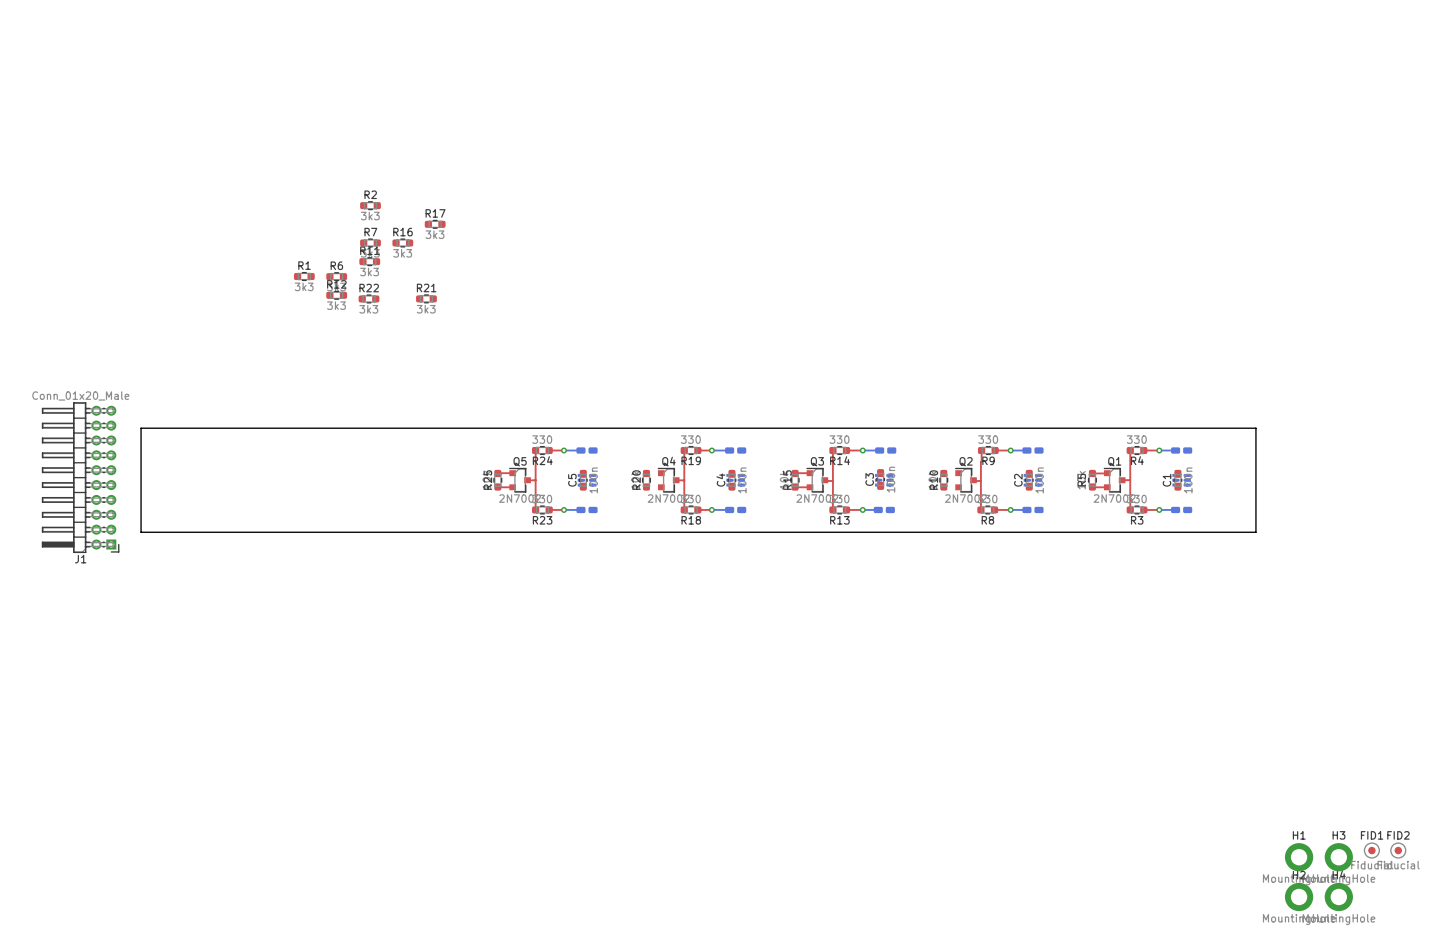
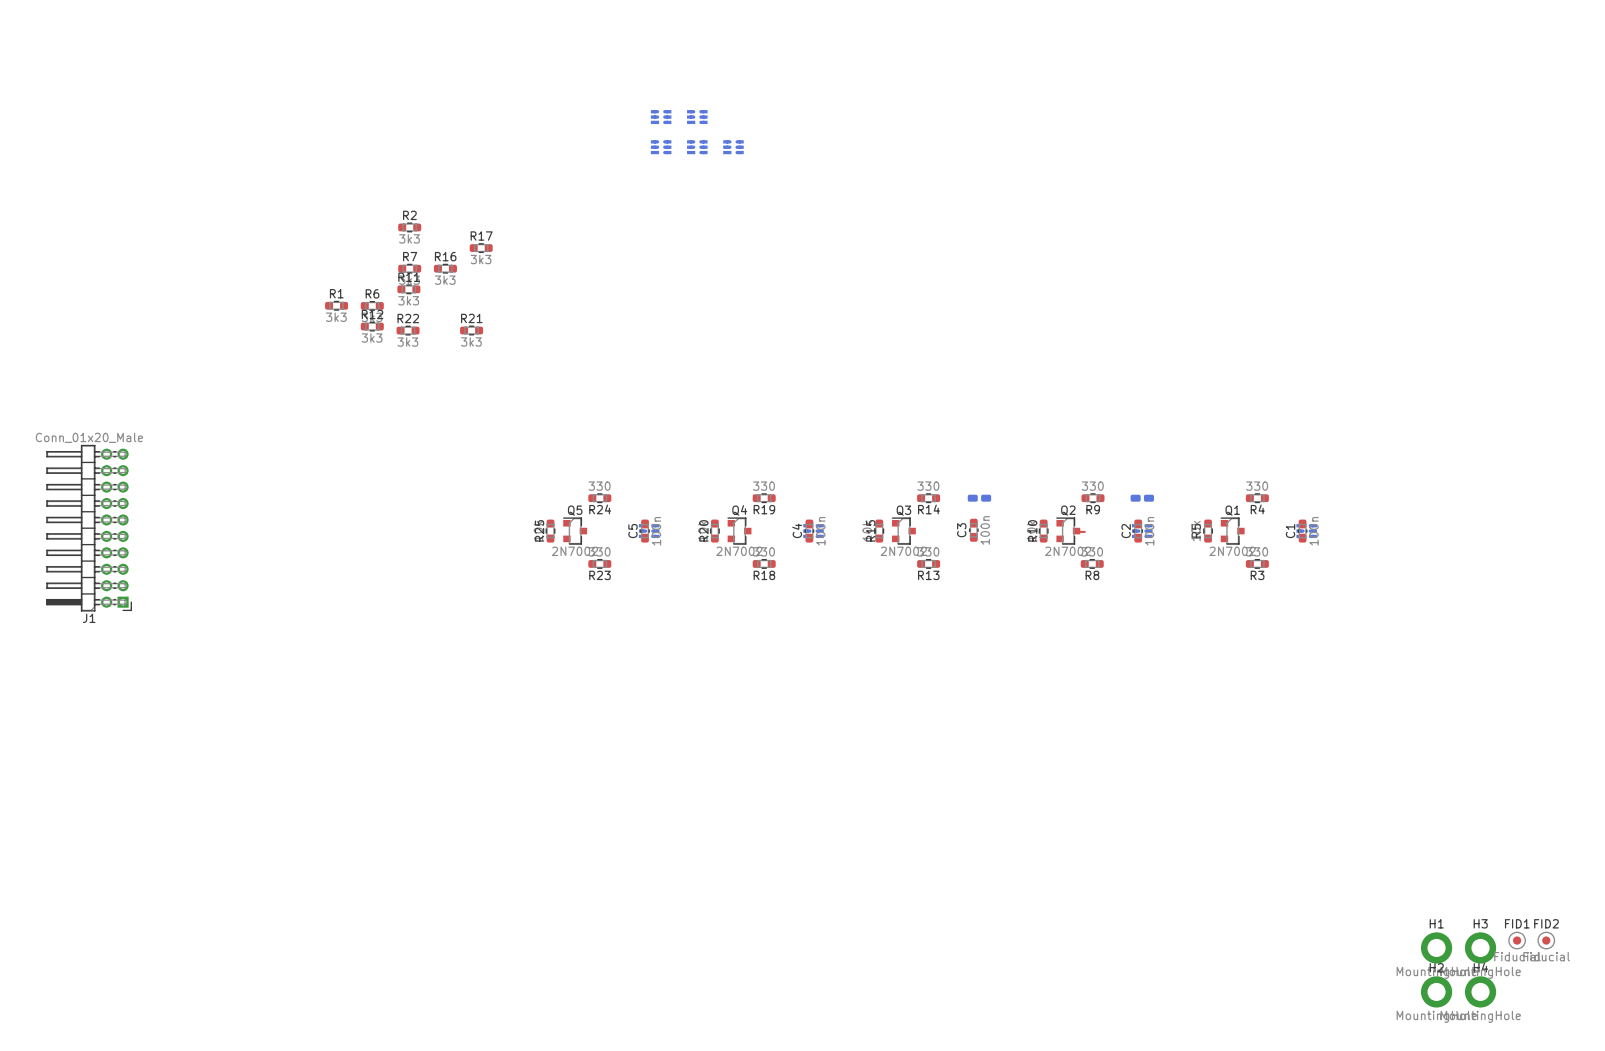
part: none -> (661, 117)
part: none -> (697, 117)
part: none -> (661, 147)
part: none -> (697, 147)
part: none -> (733, 147)
board edge: (141, 428) (141, 532) (1255, 532) (1255, 428) (141, 428) -> none
top track: (535, 450) (535, 509) -> none
top track: (549, 450) (563, 450) -> none
bottom track: (563, 450) (580, 450) -> none
via: (563, 450) -> none
part: (587, 450) -> none
top track: (684, 450) (684, 509) -> none
top track: (697, 450) (711, 450) -> none
bottom track: (711, 450) (729, 450) -> none
via: (711, 450) -> none
part: (735, 450) -> none
top track: (832, 450) (832, 509) -> none
top track: (846, 450) (862, 450) -> none
bottom track: (862, 450) (879, 450) -> none
via: (862, 450) -> none
top track: (981, 450) (980, 509) -> none
top track: (995, 450) (1010, 450) -> none
bottom track: (1010, 450) (1026, 450) -> none
via: (1010, 450) -> none
top track: (1130, 450) (1130, 509) -> none
top track: (1143, 450) (1159, 450) -> none
bottom track: (1159, 450) (1175, 450) -> none
via: (1159, 450) -> none
part: (1181, 450) -> none
top track: (512, 473) (497, 473) -> none
top track: (809, 473) (795, 473) -> none
top track: (1107, 473) (1092, 473) -> none
top track: (527, 480) (535, 480) -> none
top track: (676, 480) (684, 480) -> none
top track: (824, 480) (832, 480) -> none
part: (884, 480) -> none
top track: (1122, 480) (1130, 480) -> none
top track: (497, 487) (512, 487) -> none
top track: (795, 487) (809, 487) -> none
top track: (1092, 487) (1107, 487) -> none
top track: (549, 509) (563, 509) -> none
bottom track: (563, 509) (580, 509) -> none
via: (563, 509) -> none
part: (587, 509) -> none
top track: (697, 509) (711, 509) -> none
bottom track: (711, 509) (729, 509) -> none
via: (711, 509) -> none
part: (735, 509) -> none
top track: (846, 509) (862, 509) -> none
bottom track: (862, 509) (878, 509) -> none
via: (862, 509) -> none
part: (884, 509) -> none
top track: (994, 509) (1010, 509) -> none
bottom track: (1010, 509) (1026, 509) -> none
via: (1010, 509) -> none
part: (1032, 509) -> none
top track: (1143, 509) (1159, 509) -> none
bottom track: (1159, 509) (1175, 509) -> none
via: (1159, 509) -> none
part: (1181, 509) -> none

